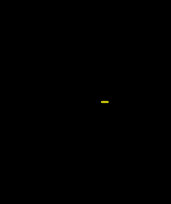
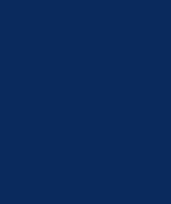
board edge: (101, 101) (107, 101) -> none

